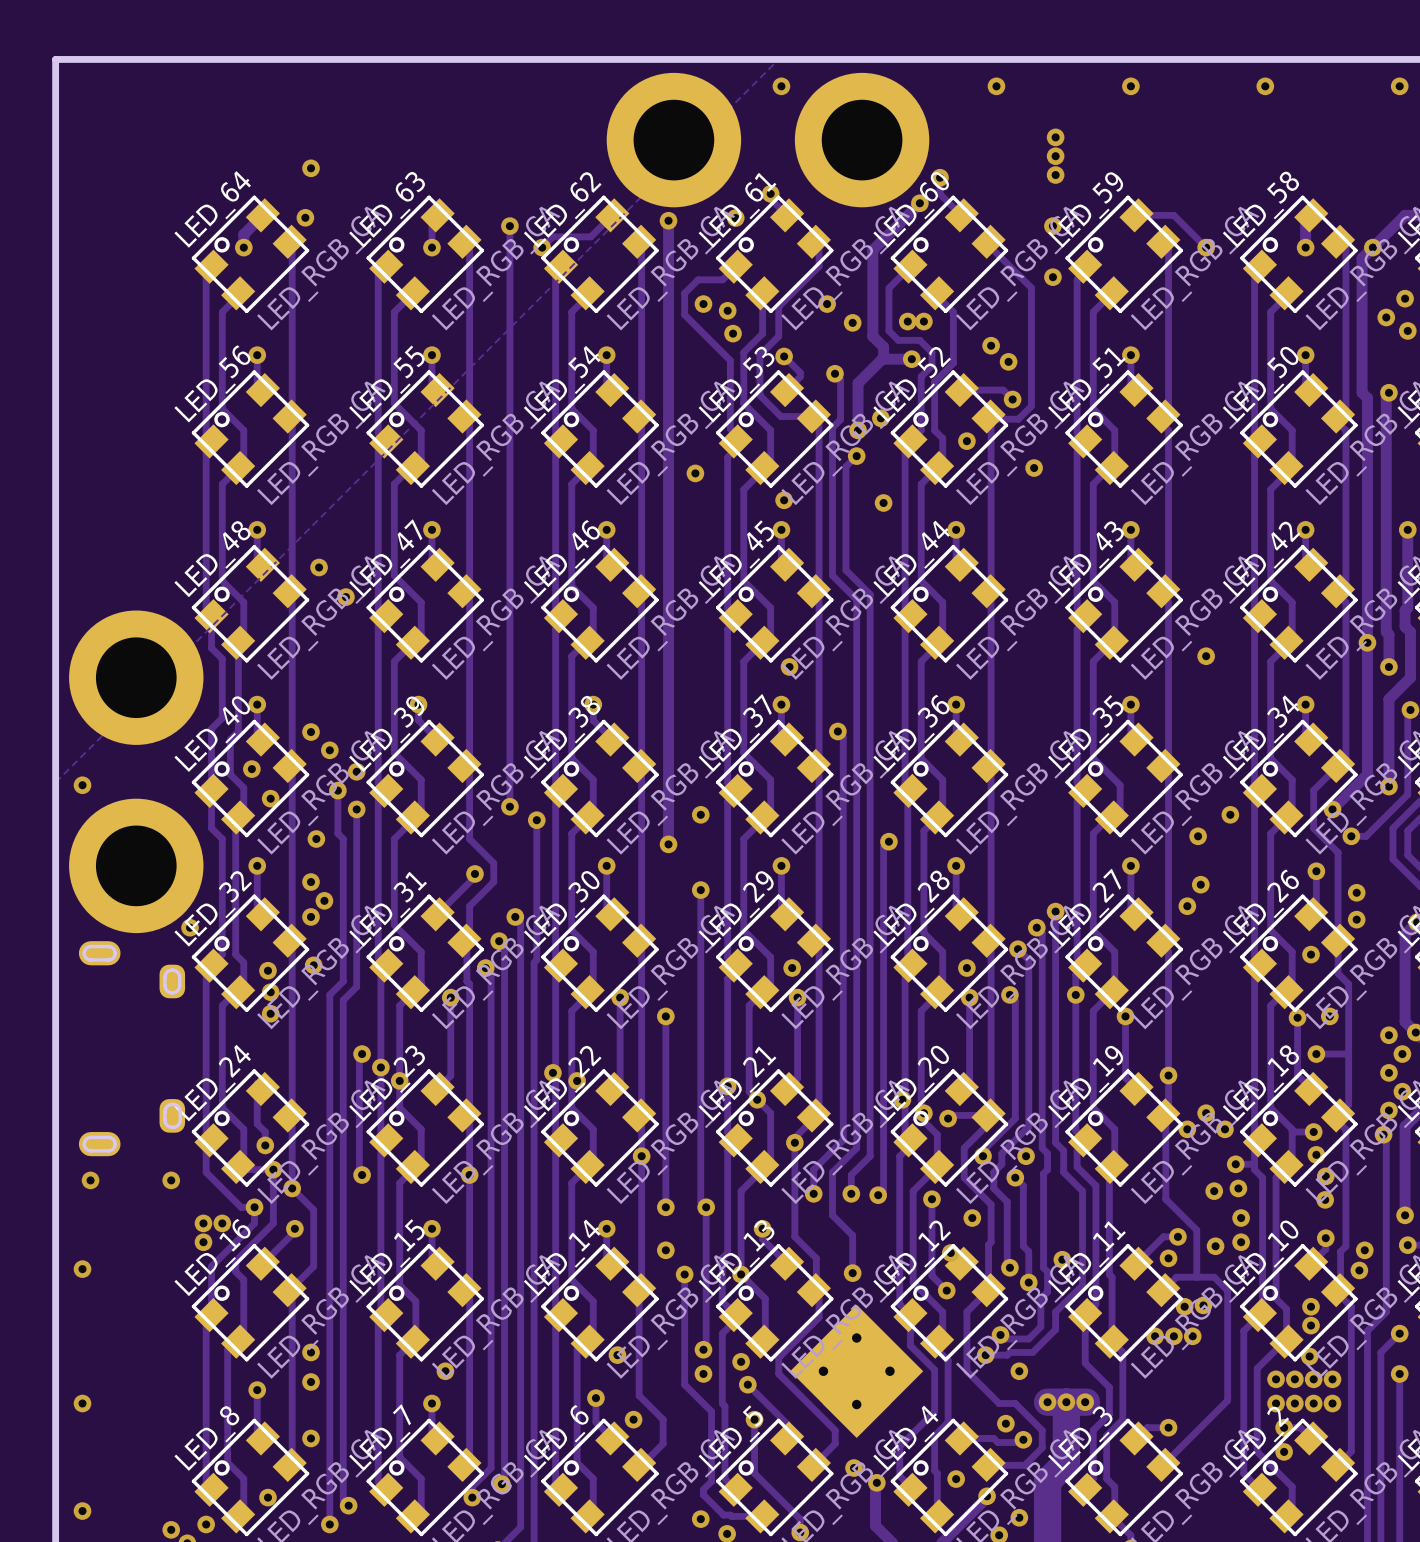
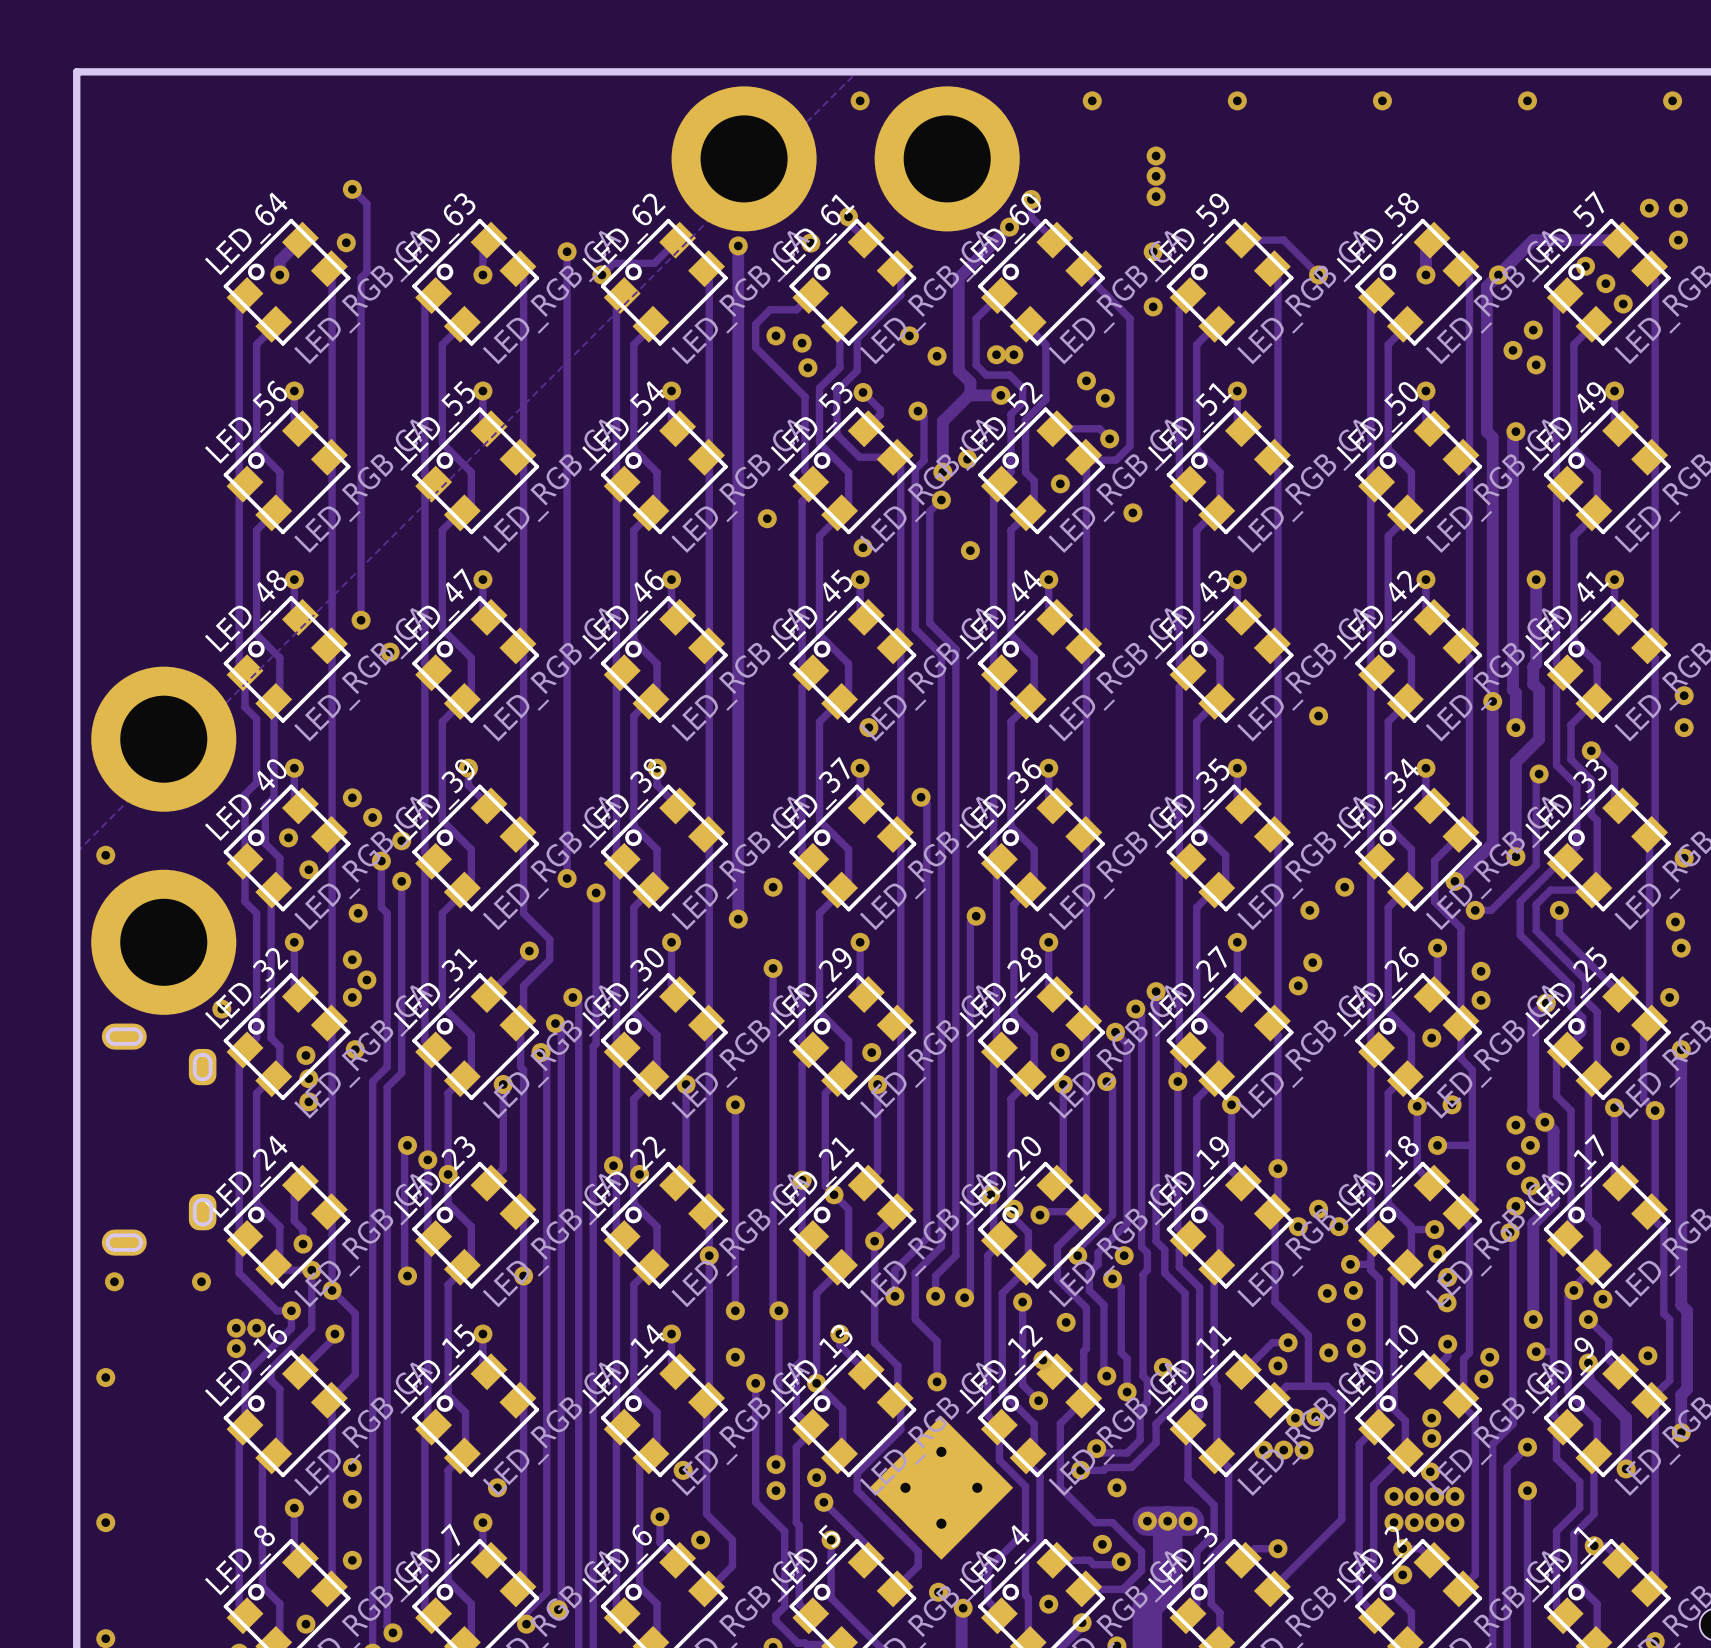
track: none -> (352, 189) (366, 203) (366, 272) (361, 277) (361, 620)

